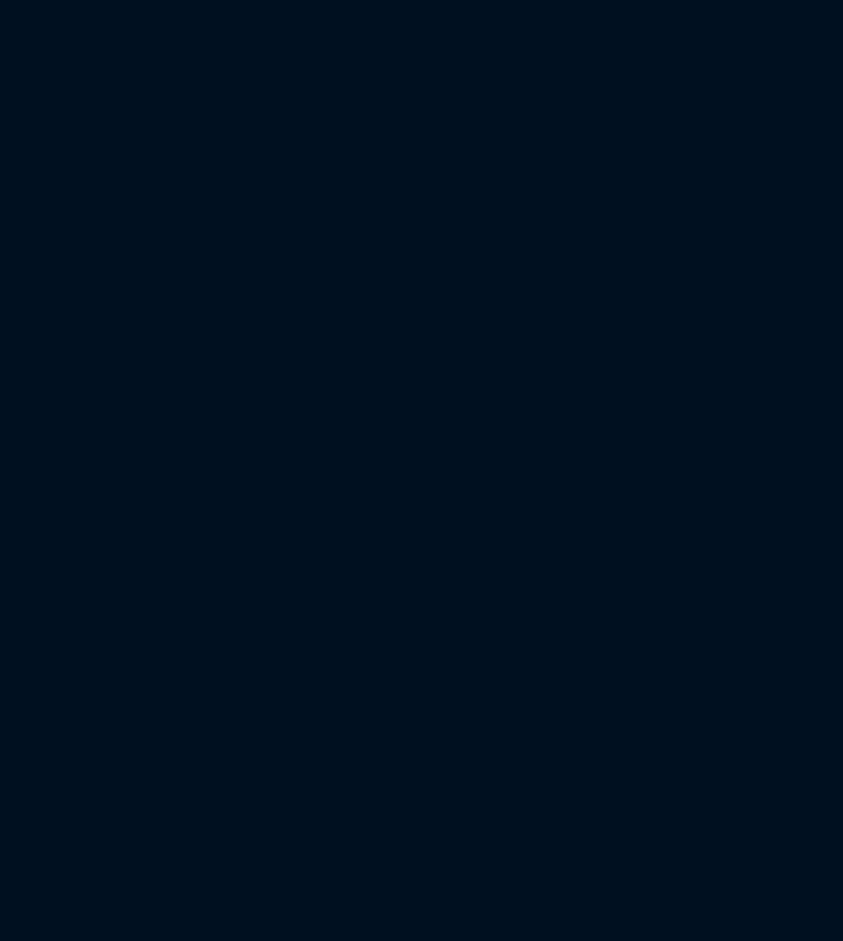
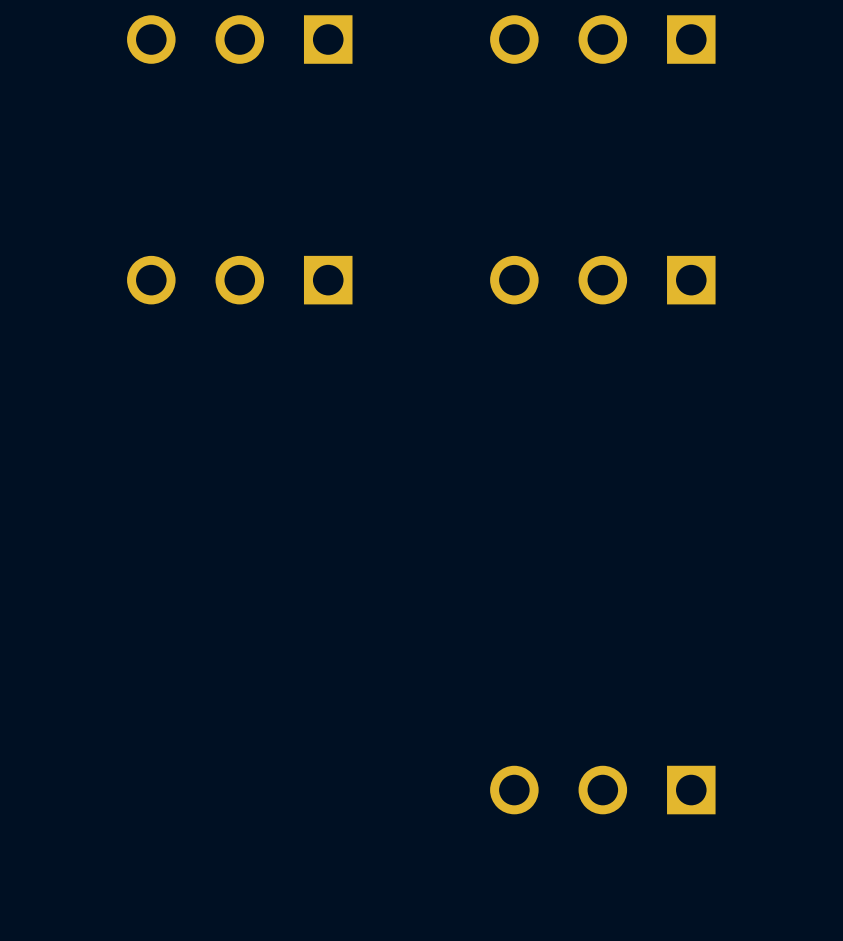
part: none -> (239, 39)
part: none -> (602, 39)
part: none -> (239, 280)
part: none -> (602, 280)
part: none -> (602, 790)

